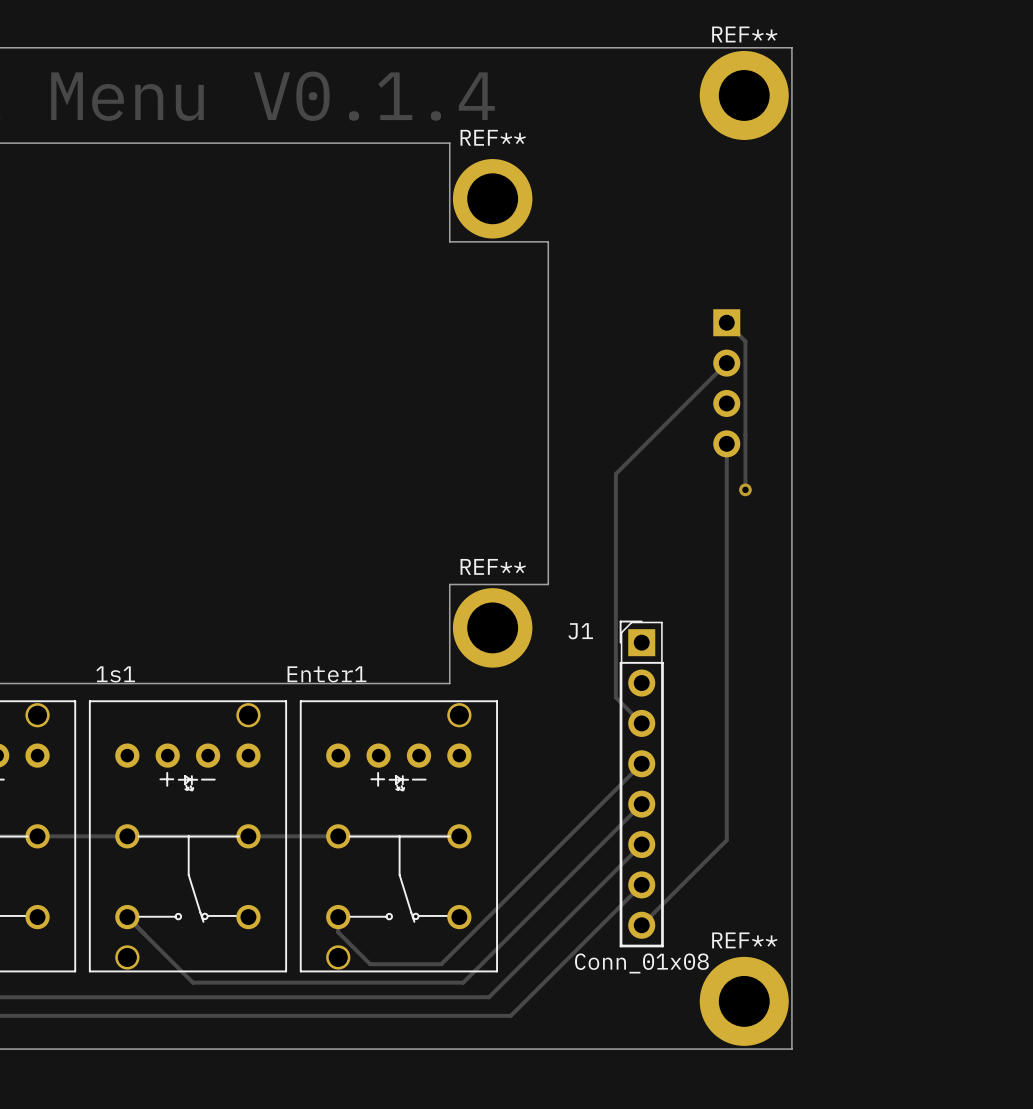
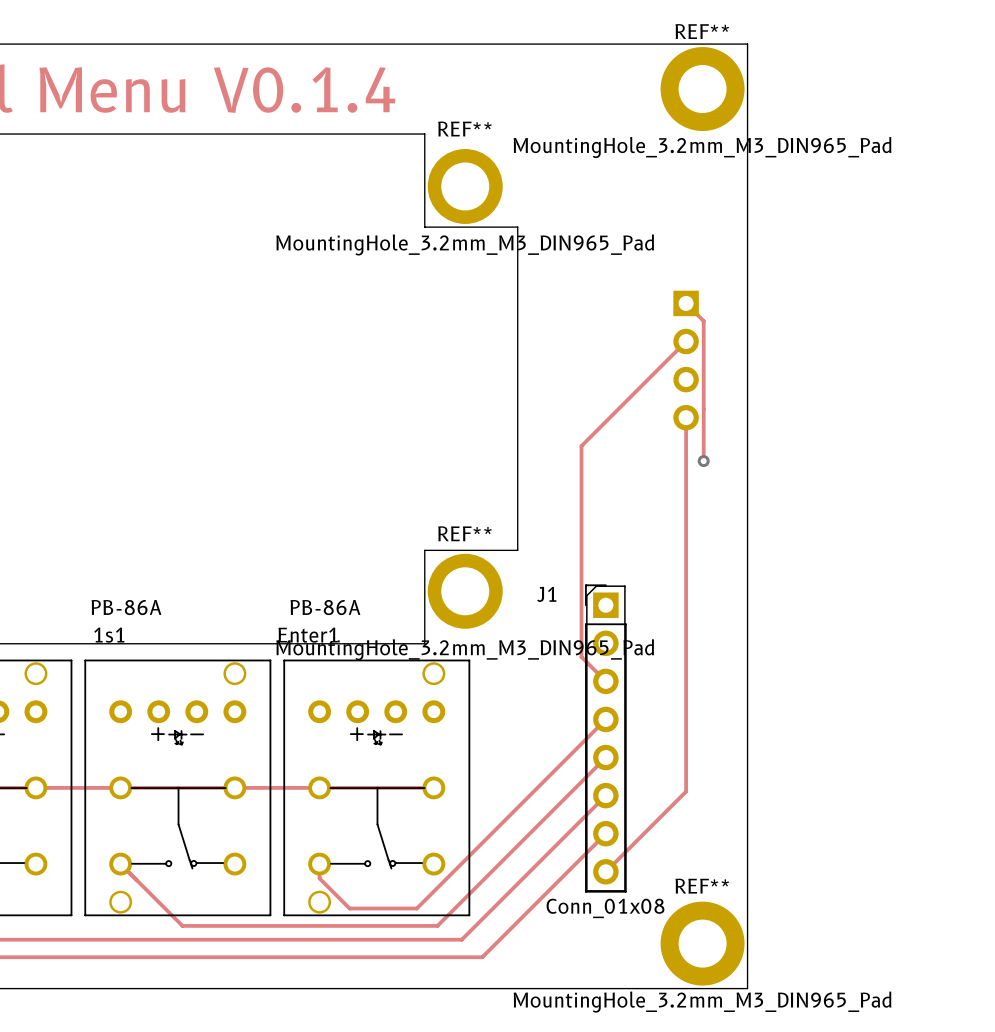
REF** value: none -> MountingHole_3.2mm_M3_DIN965_Pad (702, 147)
REF** value: none -> MountingHole_3.2mm_M3_DIN965_Pad (465, 244)
1s1 value: none -> PB-86A (126, 607)
Enter1 value: none -> PB-86A (325, 607)
REF** value: none -> MountingHole_3.2mm_M3_DIN965_Pad (465, 649)
REF** value: none -> MountingHole_3.2mm_M3_DIN965_Pad (702, 1002)

